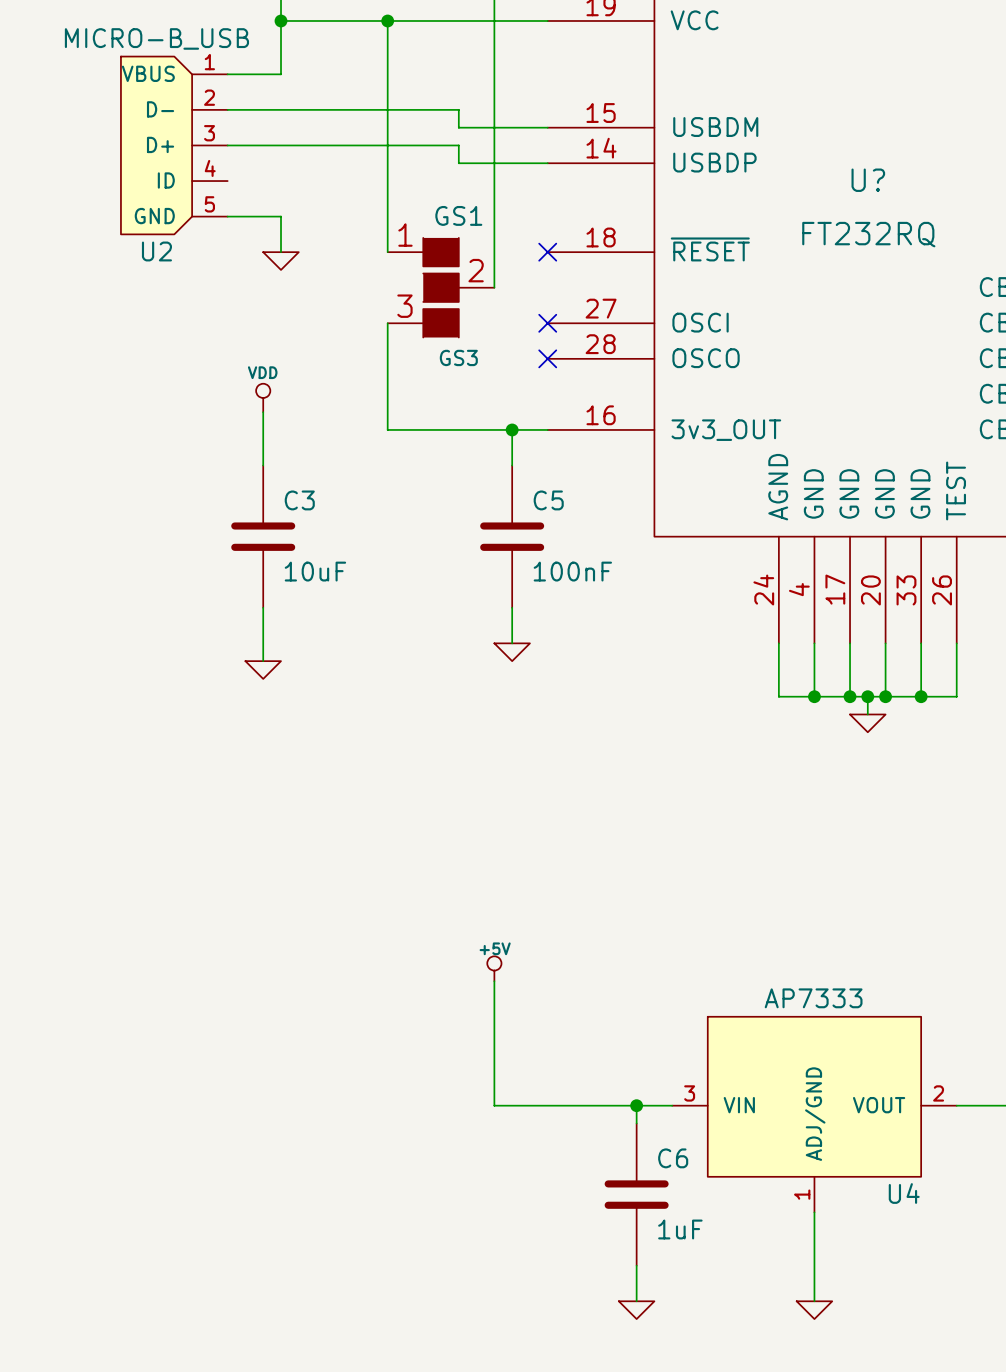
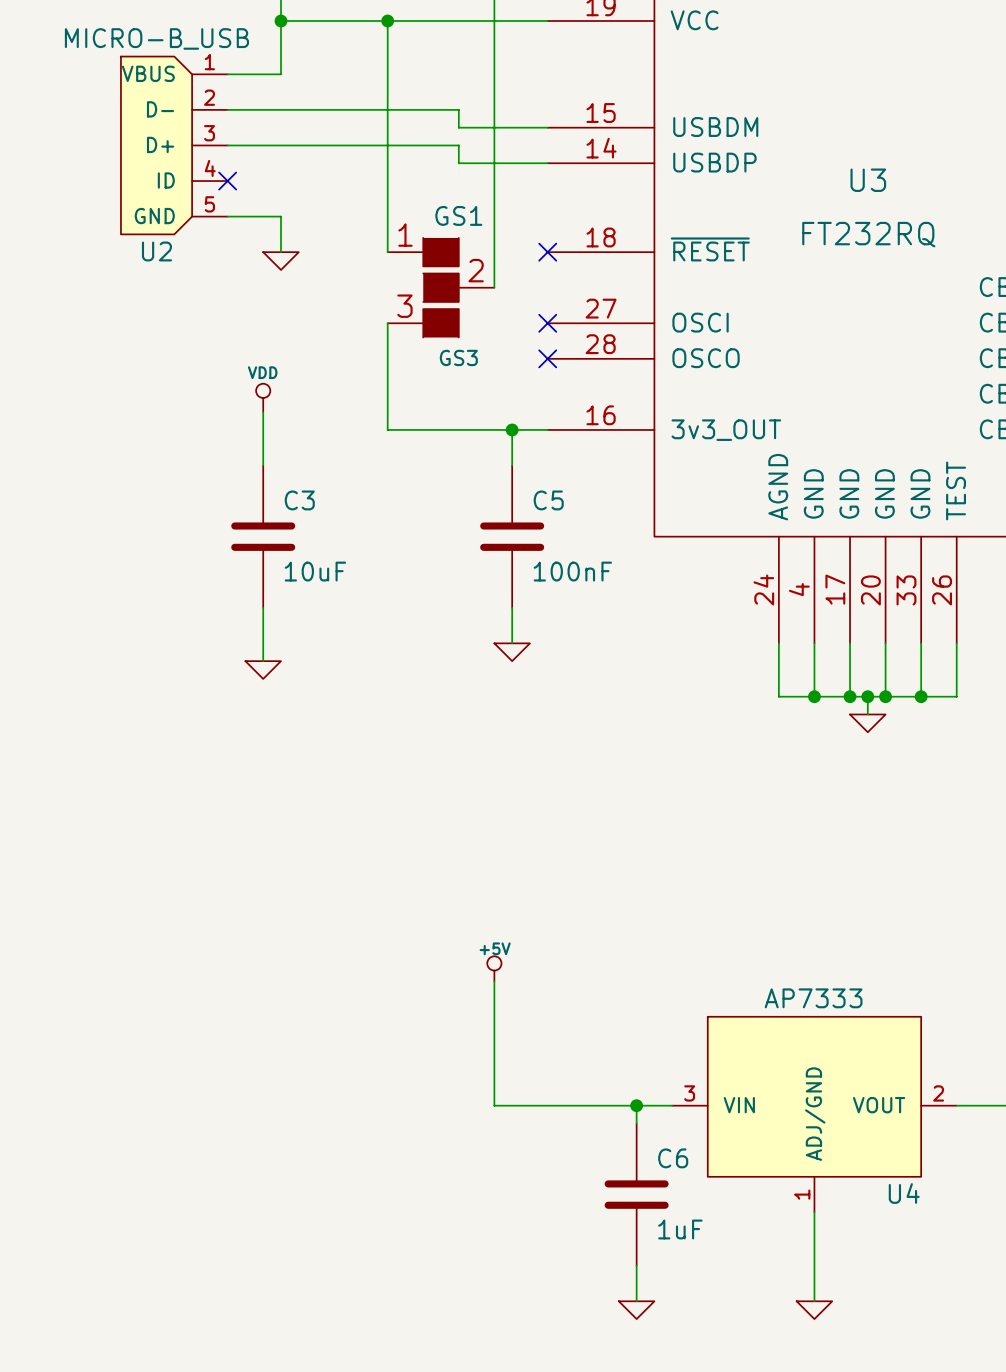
U? name: U? (868, 180) -> U3 (868, 180)
no-connect mark: none -> (227, 181)

